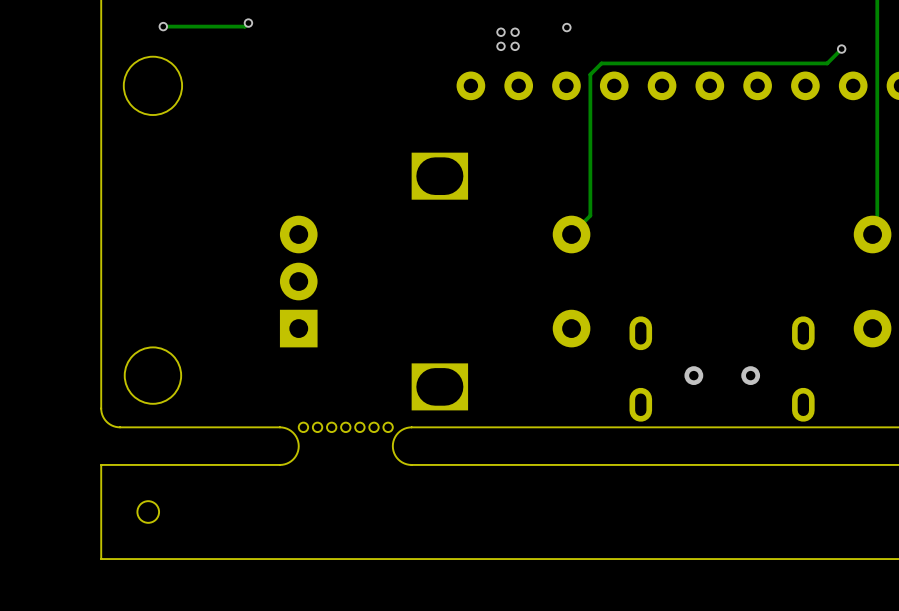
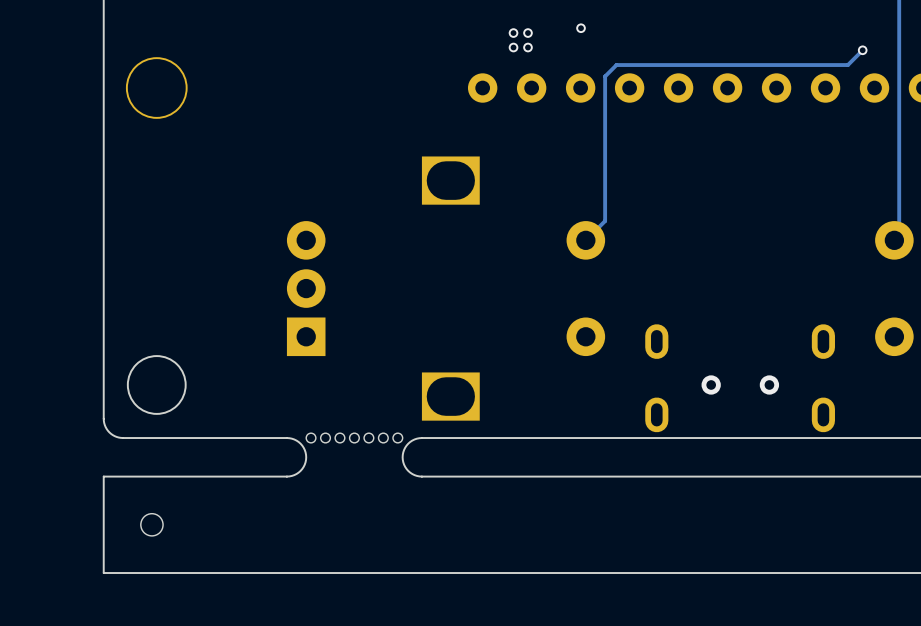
track: (248, 23) (244, 26) (163, 26) -> none
via: (248, 23) -> none
via: (163, 26) -> none

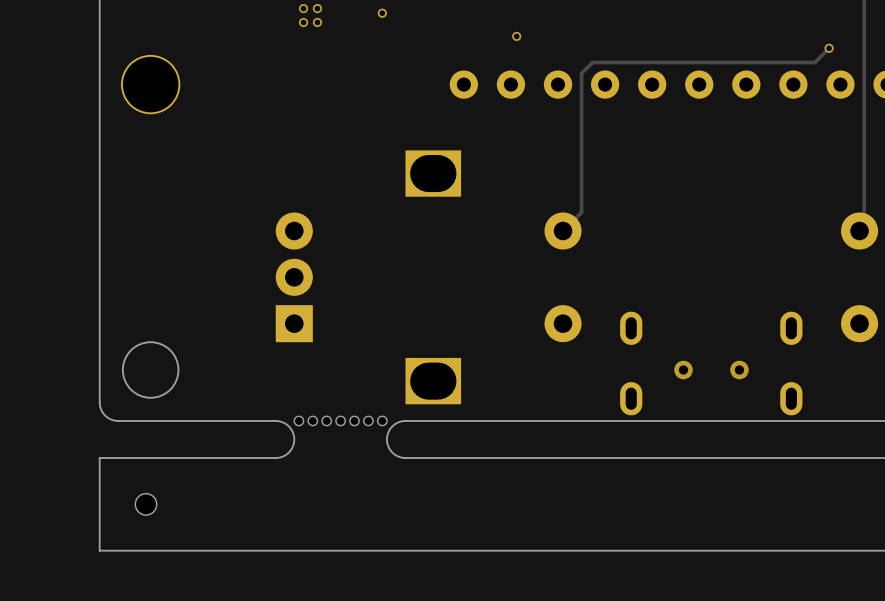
via: none -> (303, 8)
via: none -> (317, 8)
via: none -> (382, 13)
via: none -> (303, 22)
via: none -> (317, 22)
via: (581, 28) -> none
via: (513, 33) -> none
via: (527, 33) -> none
via: none -> (516, 36)
via: (513, 47) -> none
via: (527, 47) -> none

